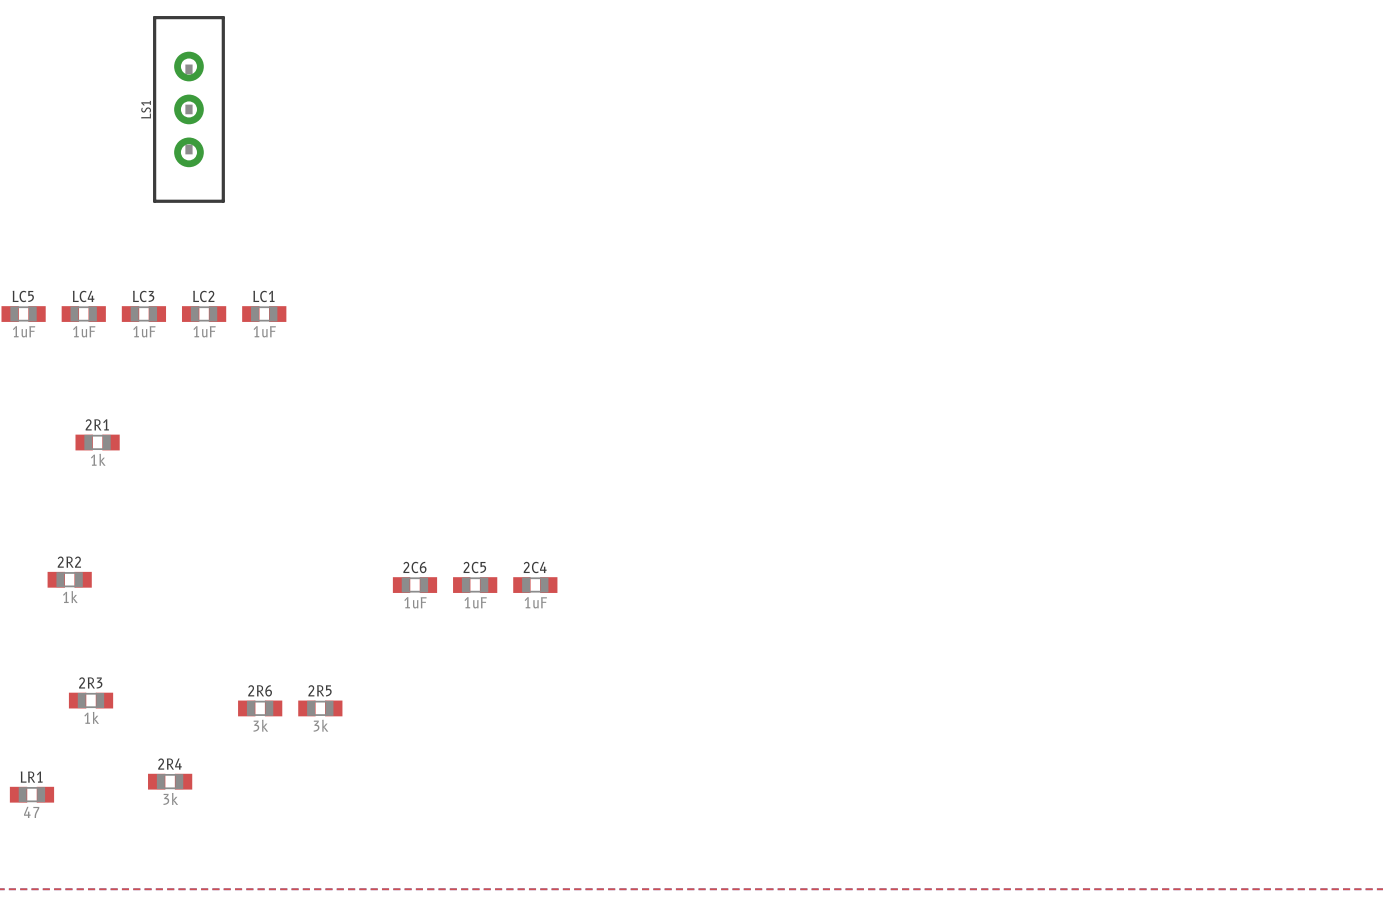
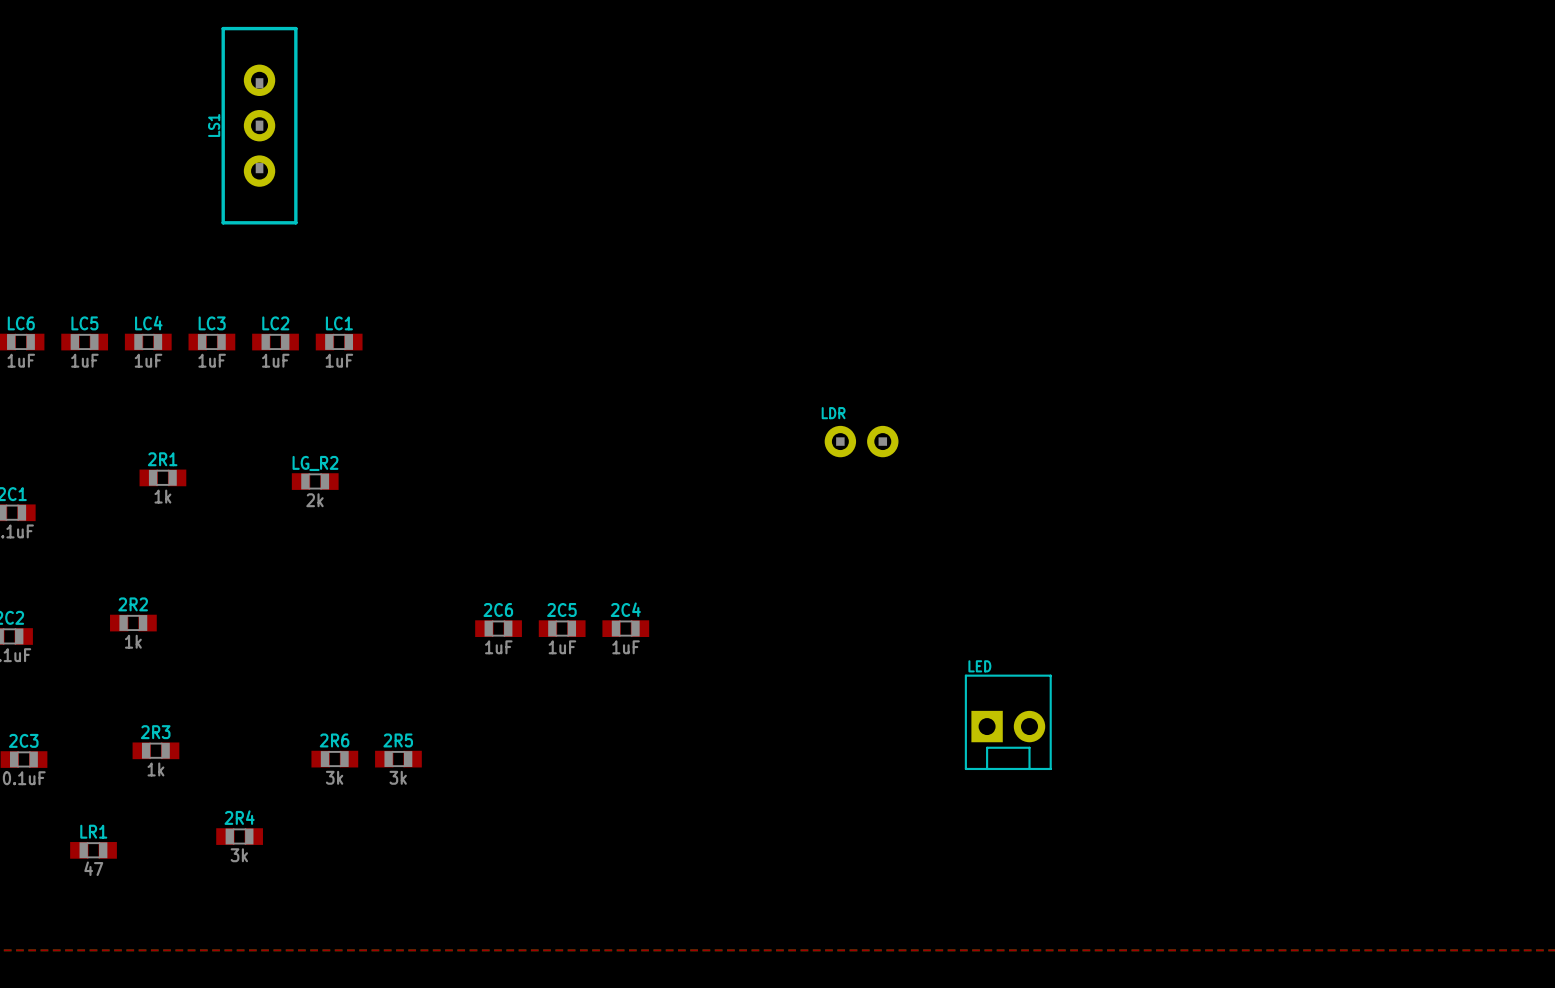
LDR: none -> (861, 441)
LG_R2: none -> 2k (315, 481)
LED: none -> (1008, 722)

